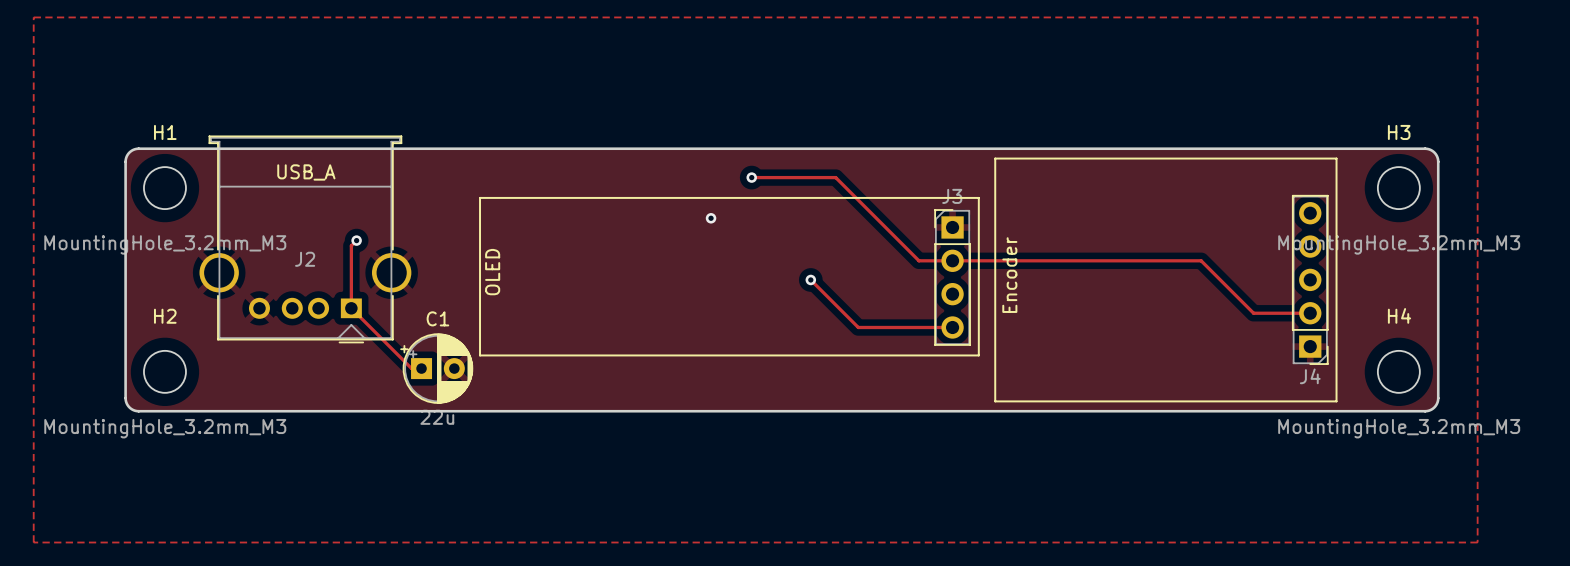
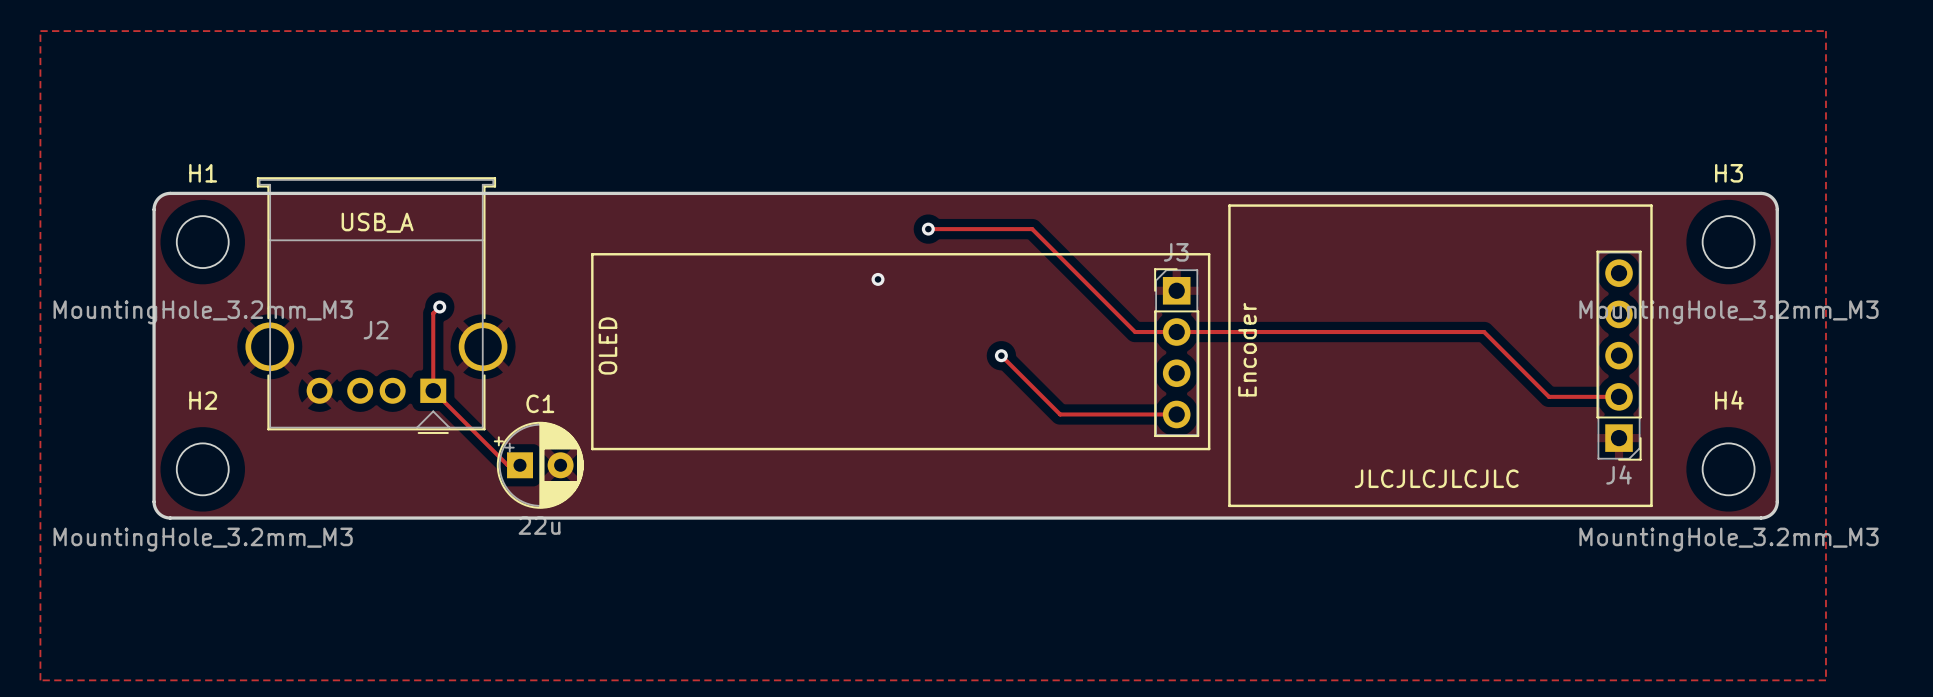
text: none -> JLCJLCJLCJLC (1436, 478)

